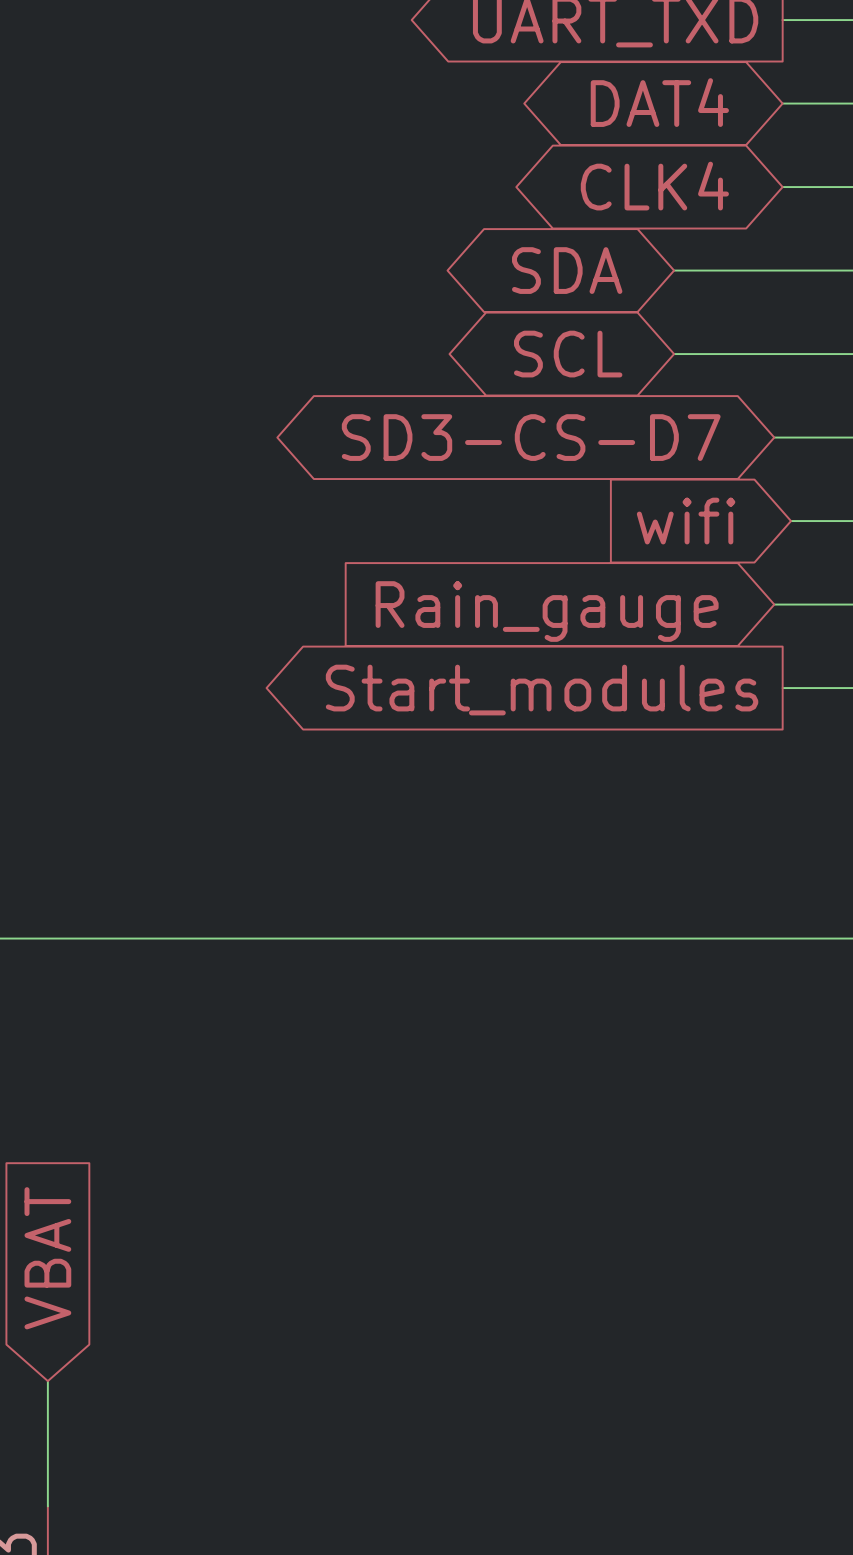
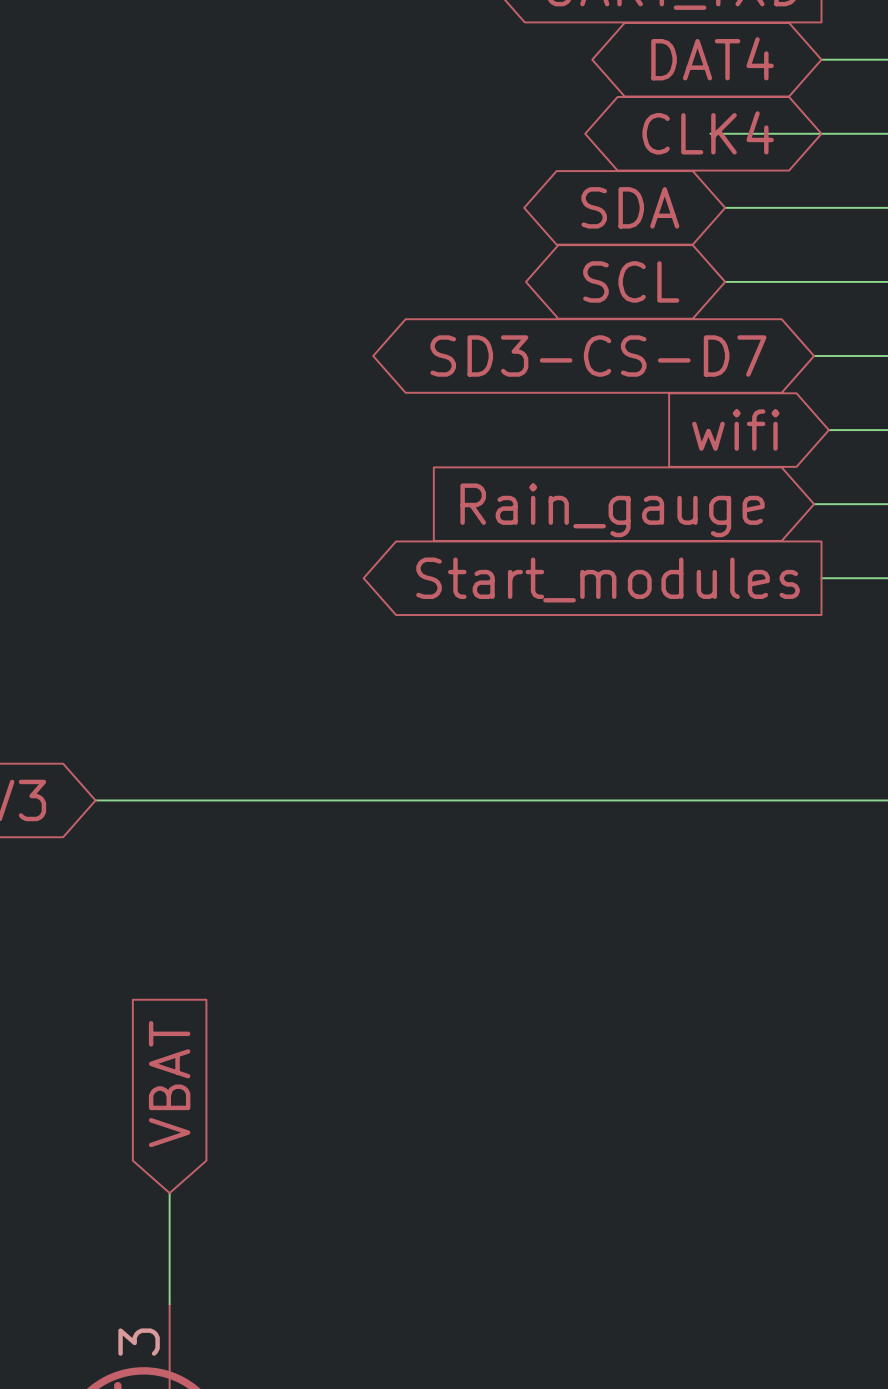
wire: none -> (710, 133) (821, 133)

